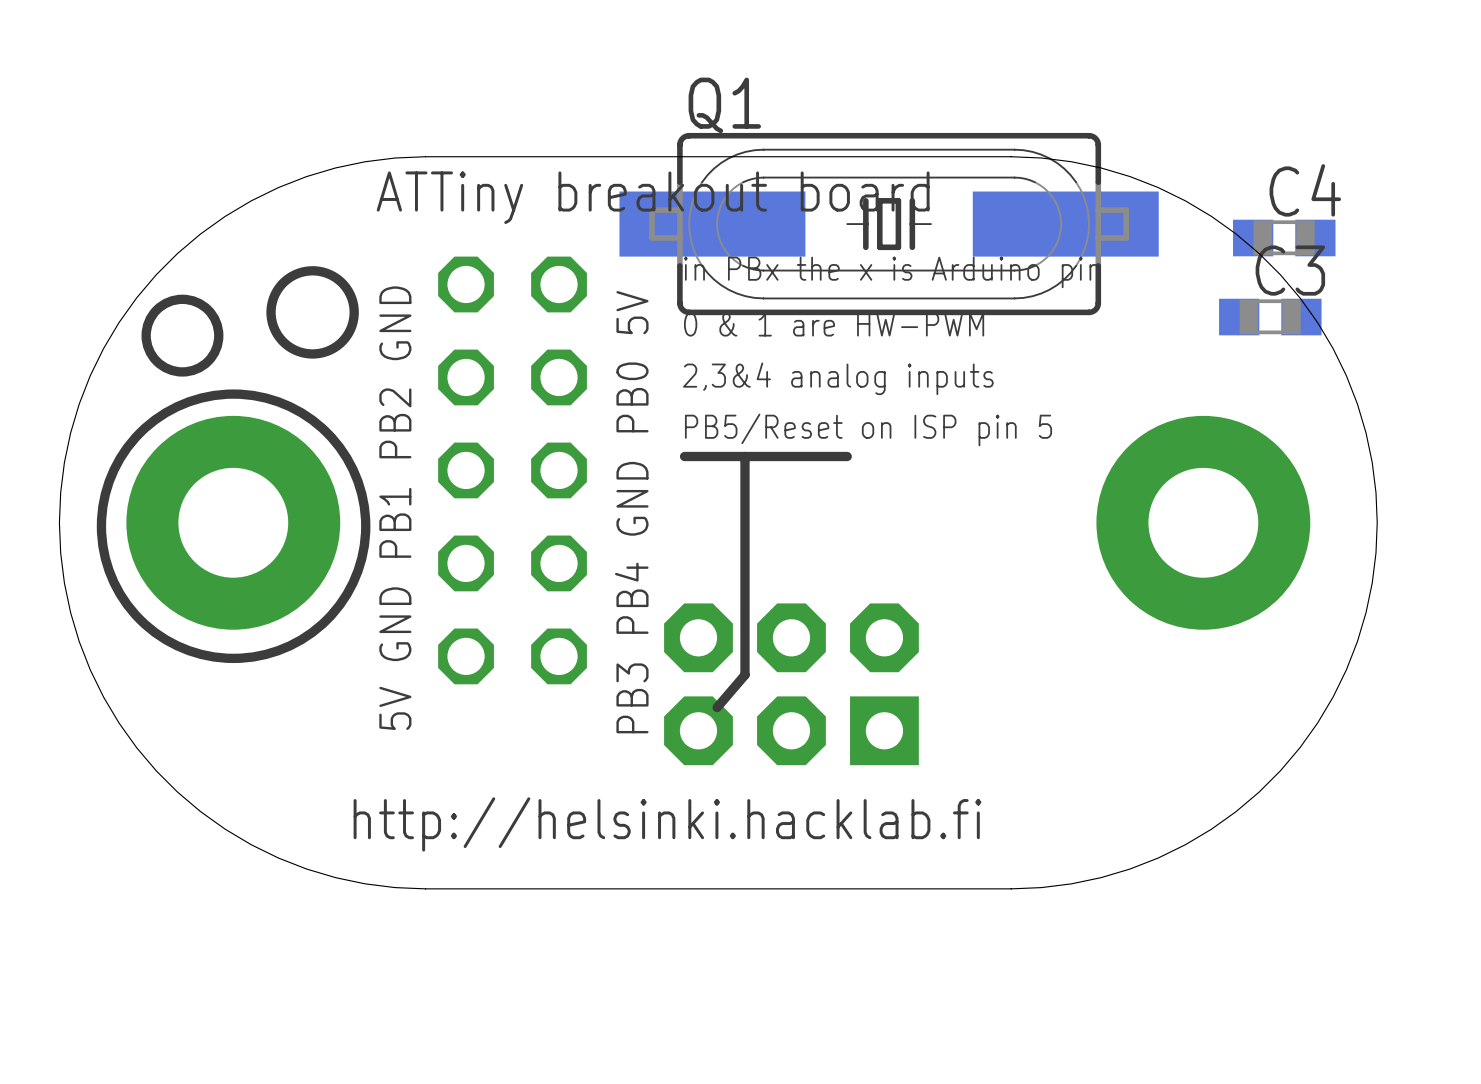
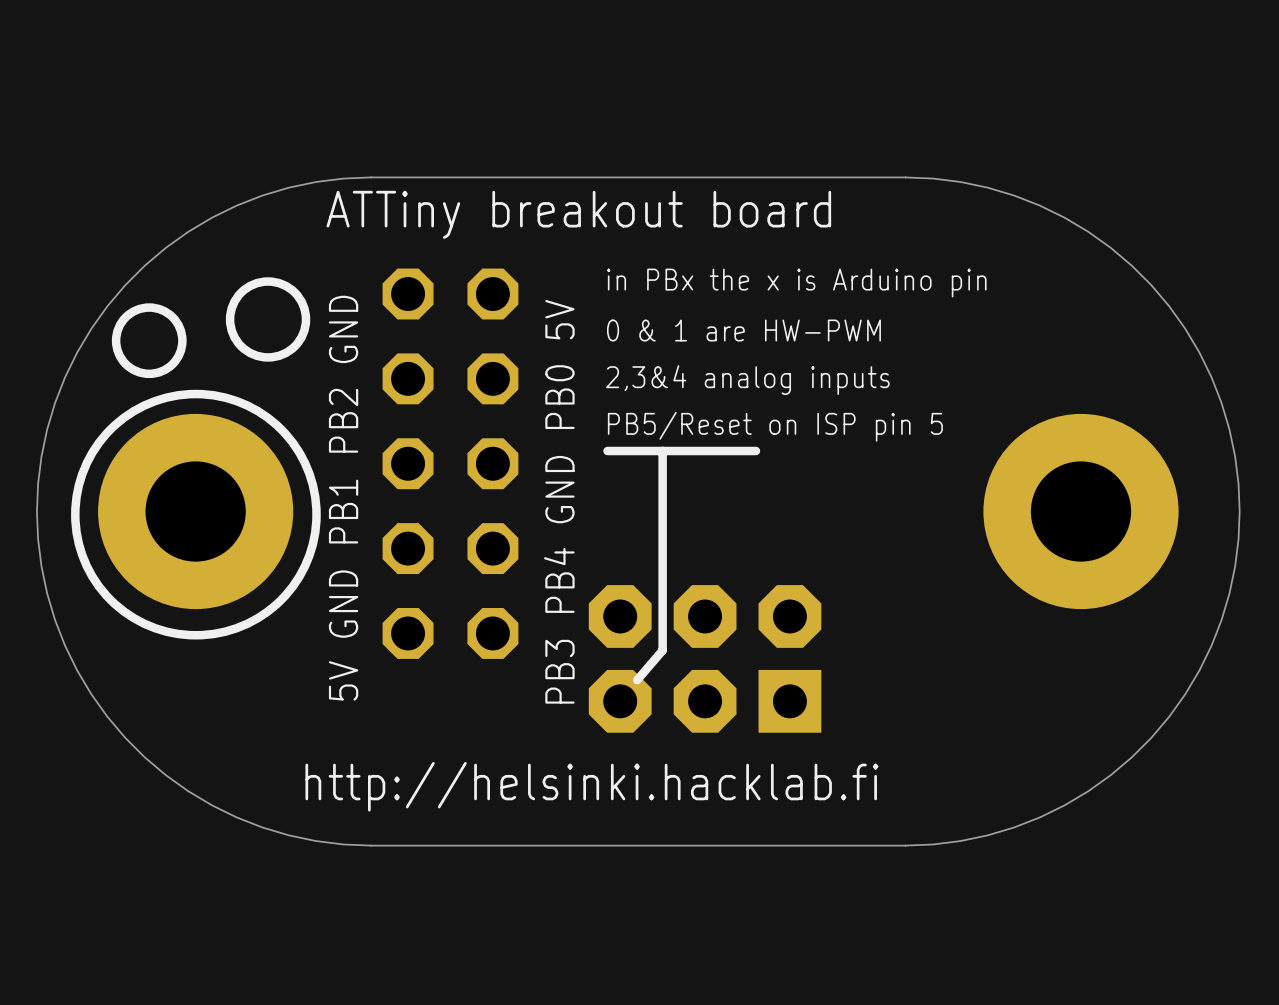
Q1: (889, 224) -> none
C4: (1284, 238) -> none
C3: (1270, 317) -> none

